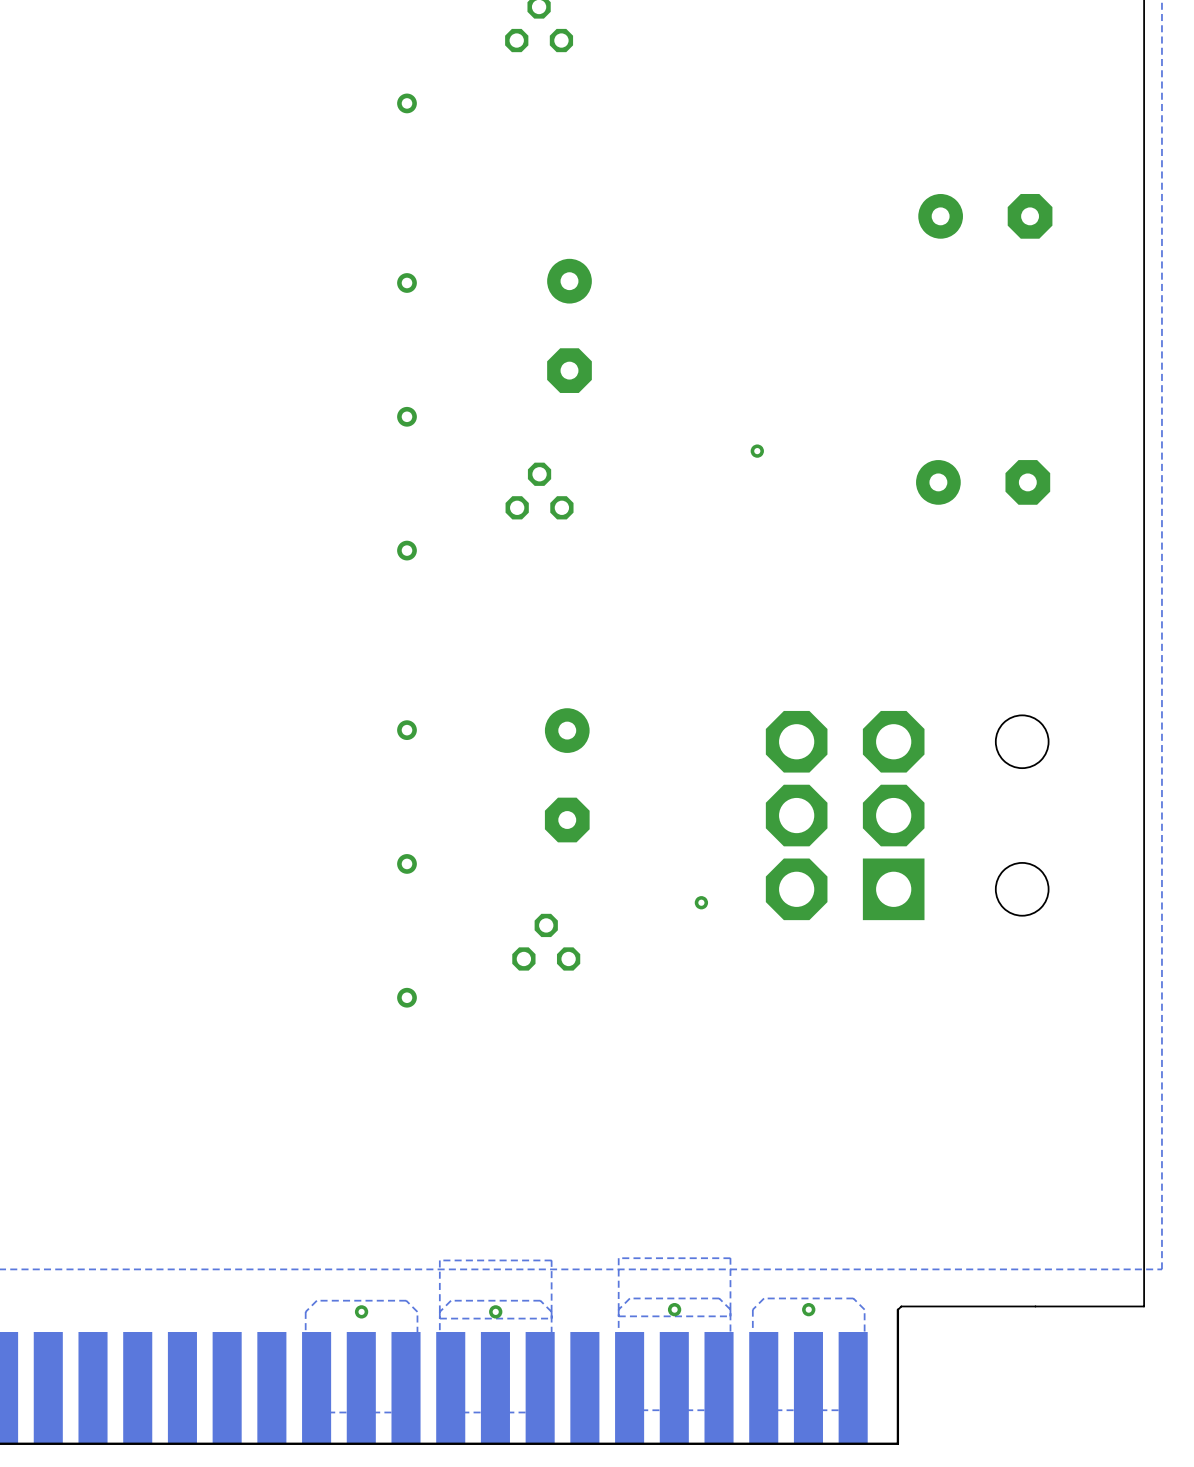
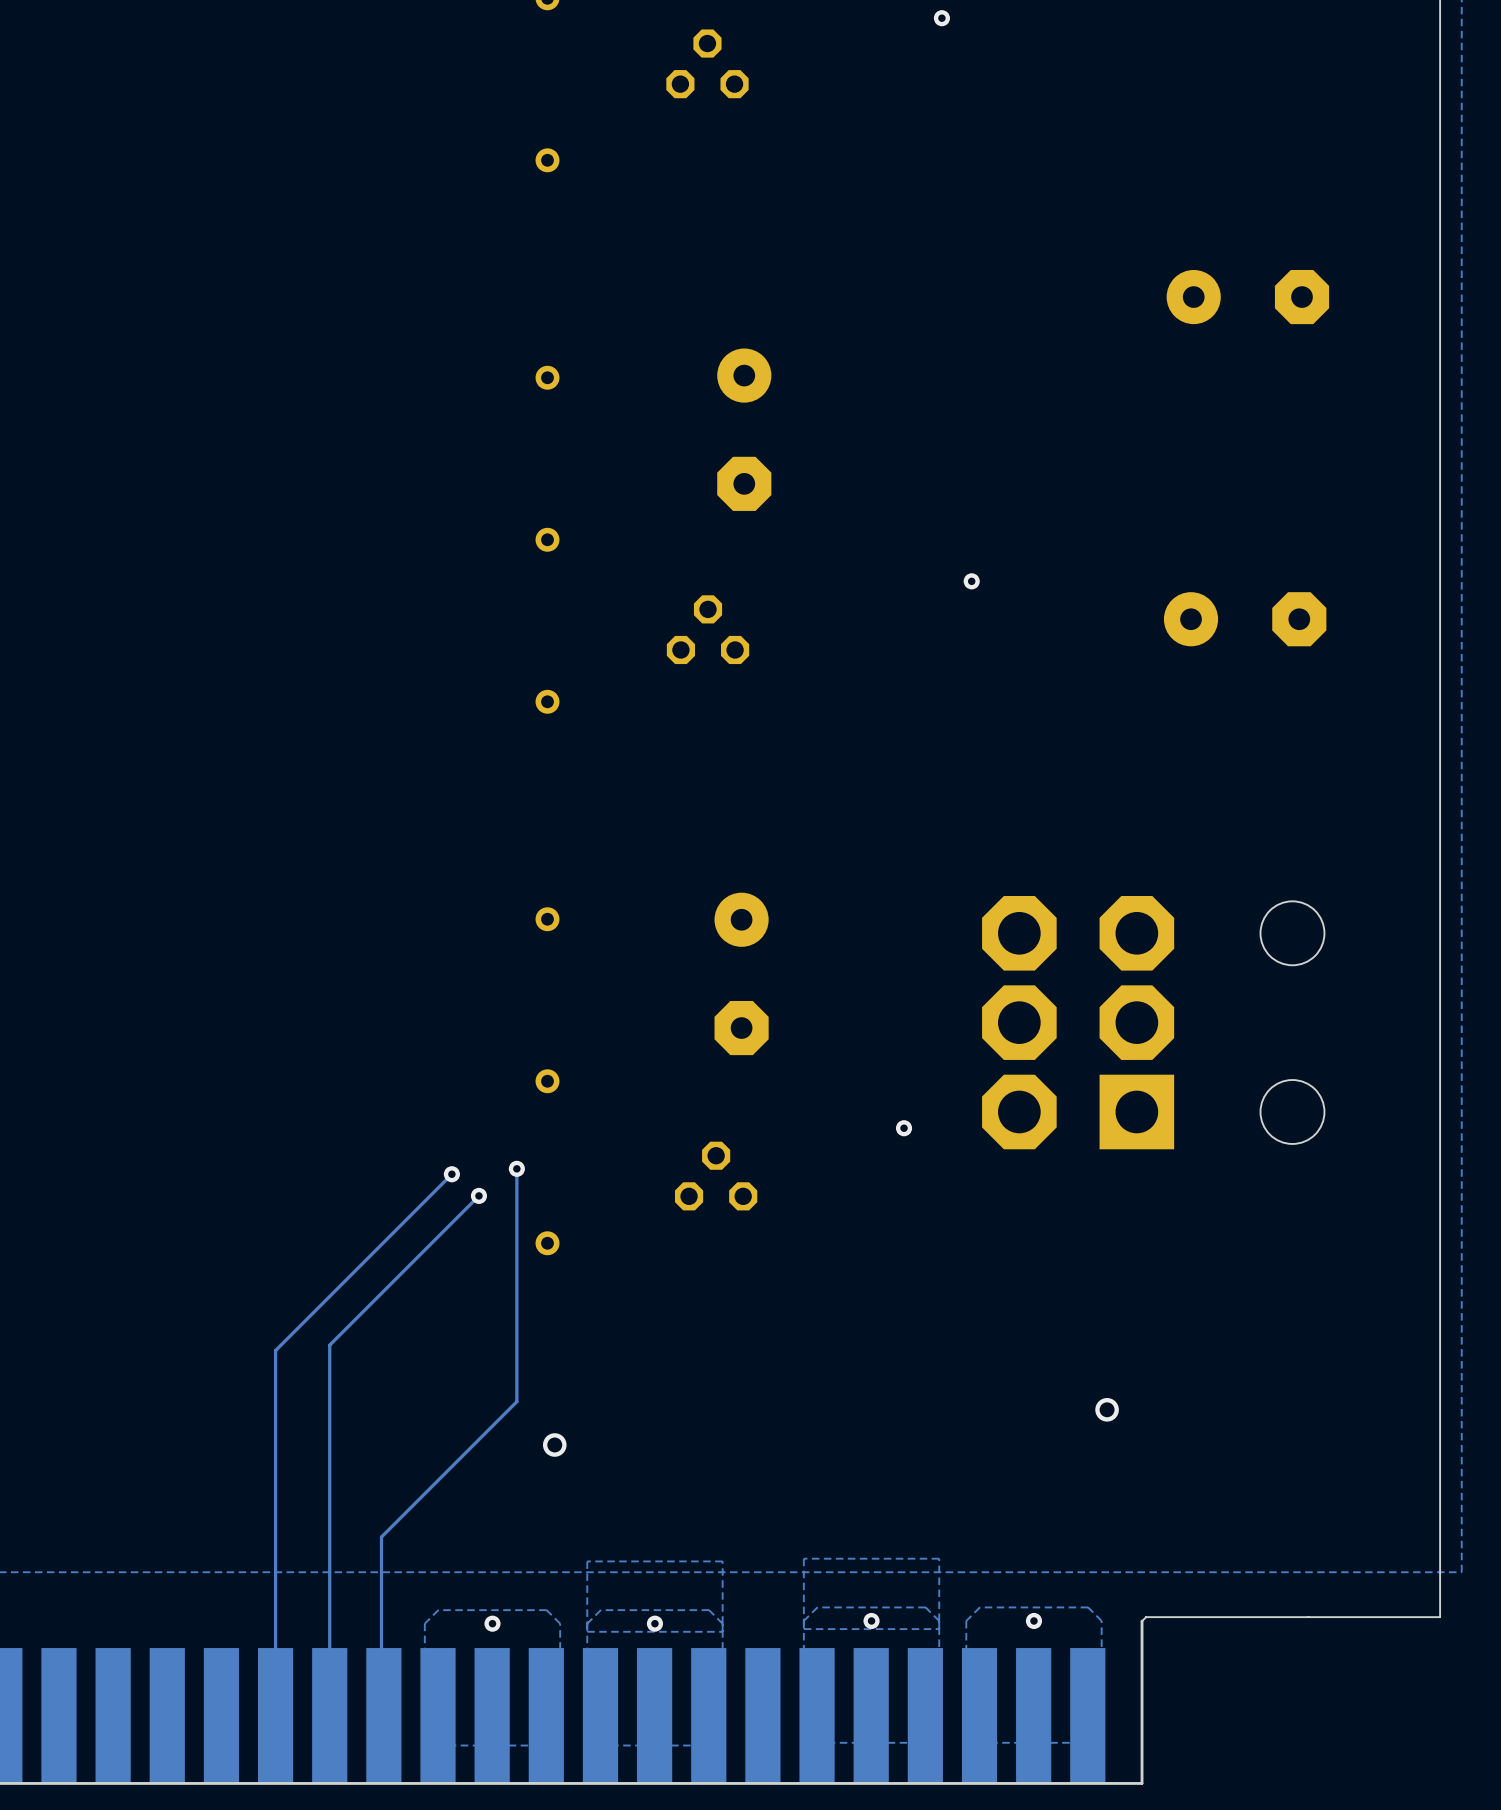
track: none -> (516, 1168) (516, 1401) (381, 1537) (381, 1713) (383, 1715)
via: none -> (516, 1168)
track: none -> (451, 1174) (275, 1350) (275, 1715)
via: none -> (451, 1174)
track: none -> (478, 1195) (329, 1345) (329, 1715)
via: none -> (478, 1195)
via: none -> (1107, 1409)
via: none -> (554, 1444)

